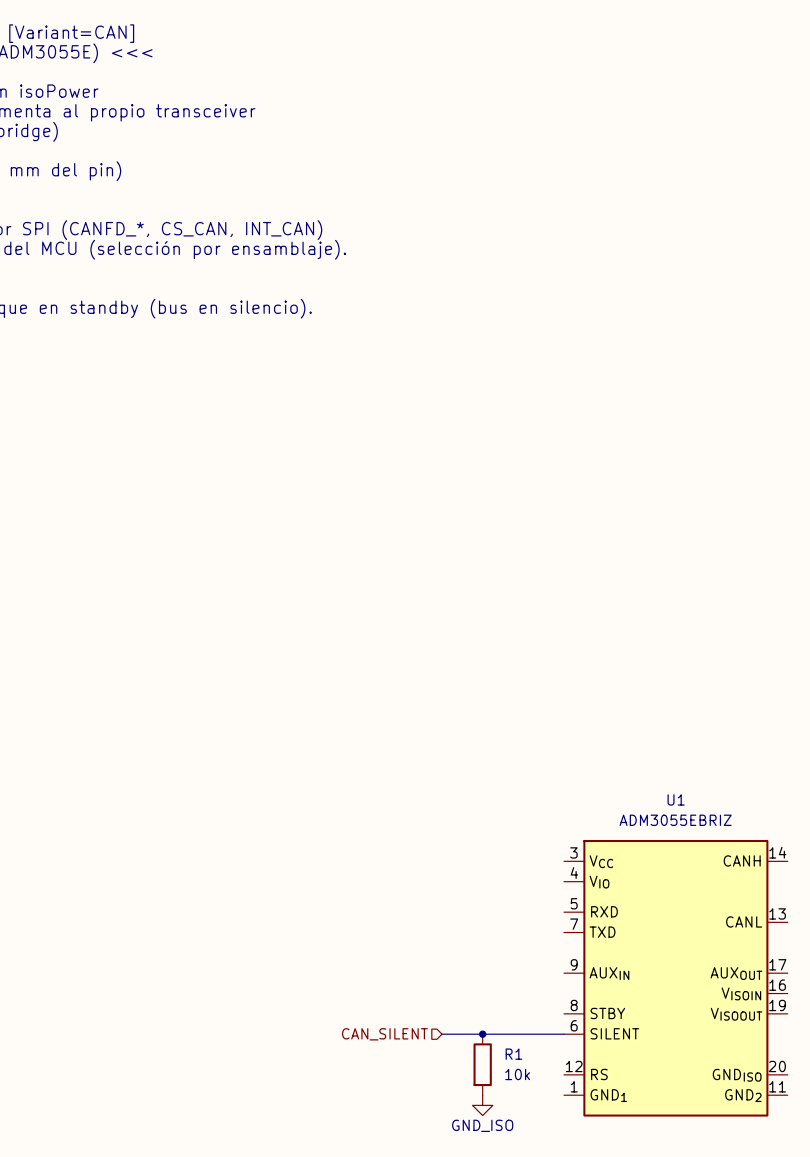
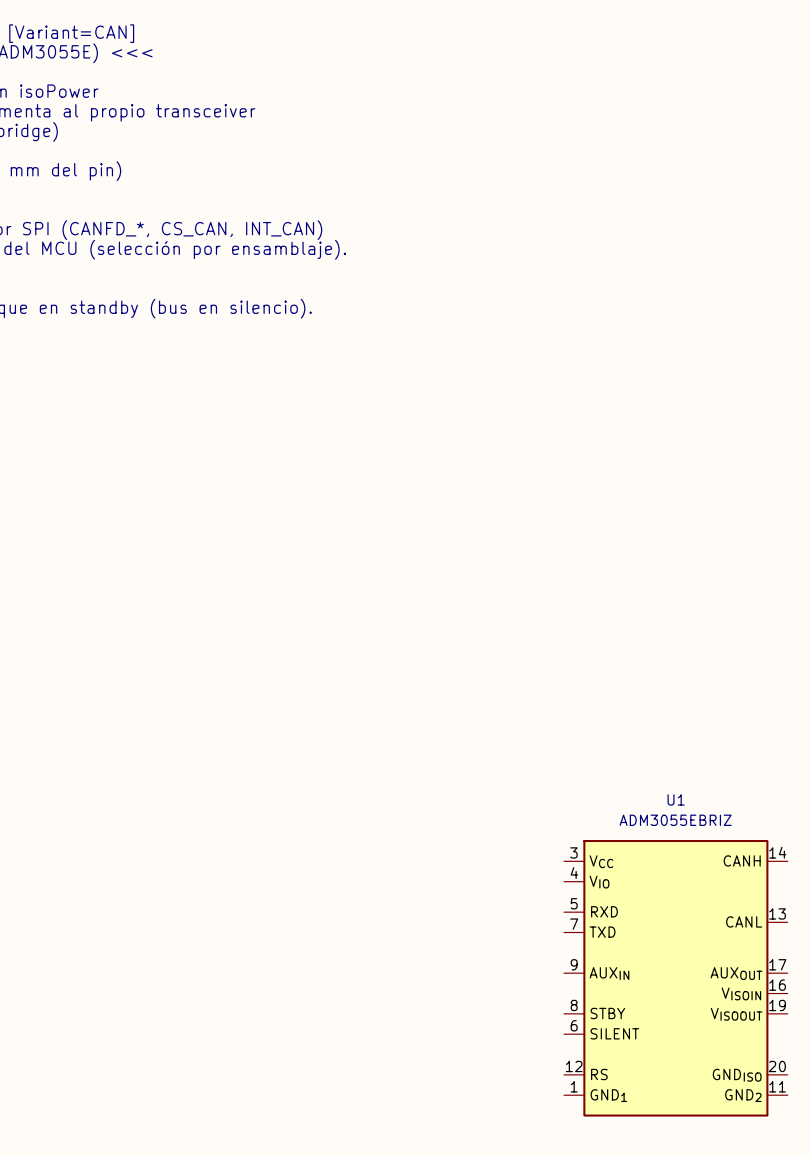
hierarchical label: CAN_SILENT (384, 1034) -> none
wire: (441, 1034) (564, 1034) -> none
junction: (482, 1034) -> none
R1: 10k (482, 1064) -> none
power symbol: GND_ISO (482, 1105) -> none

